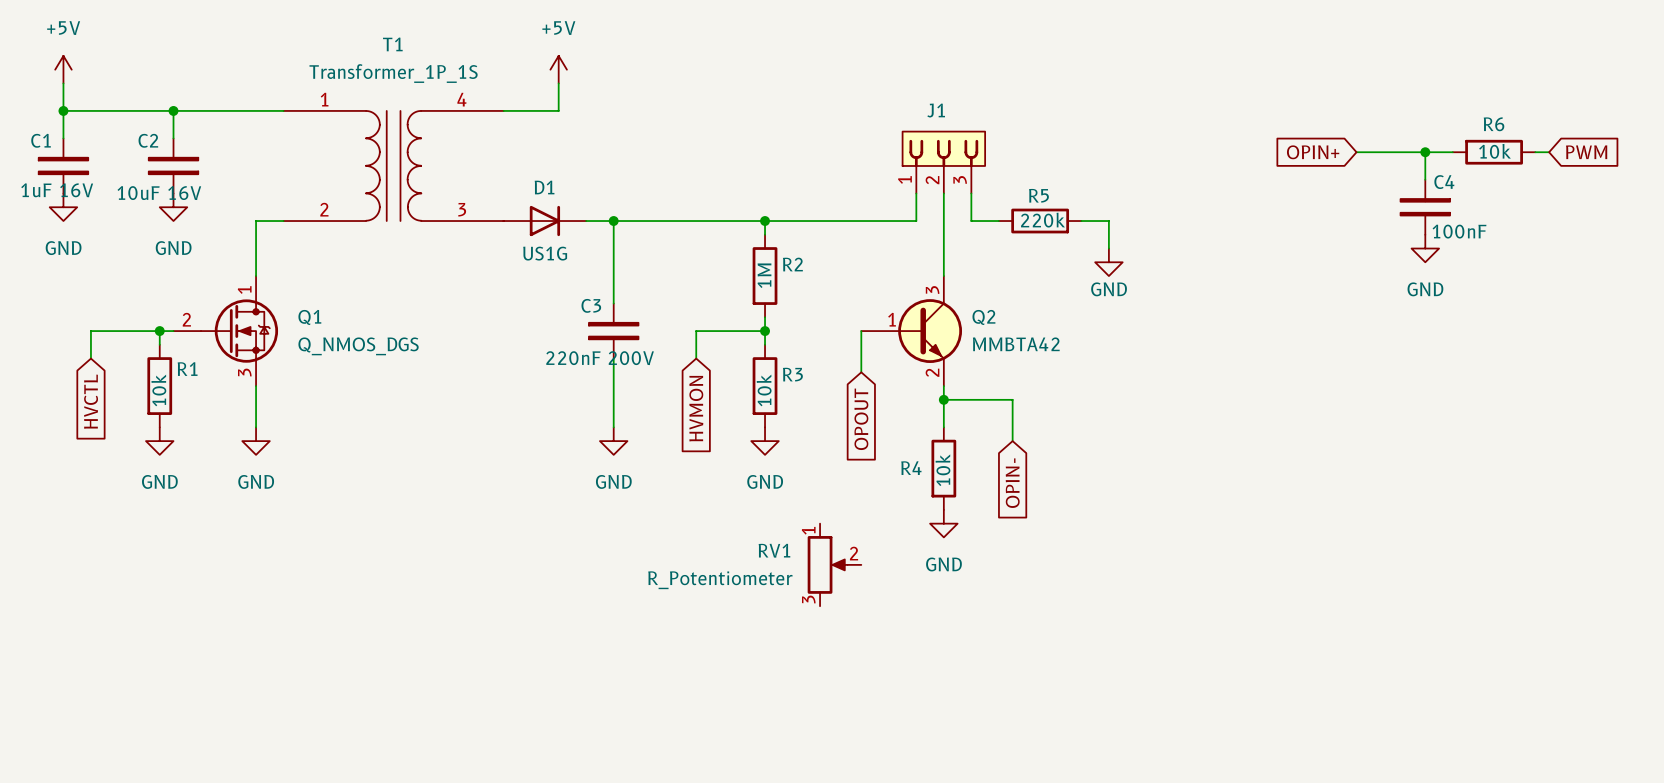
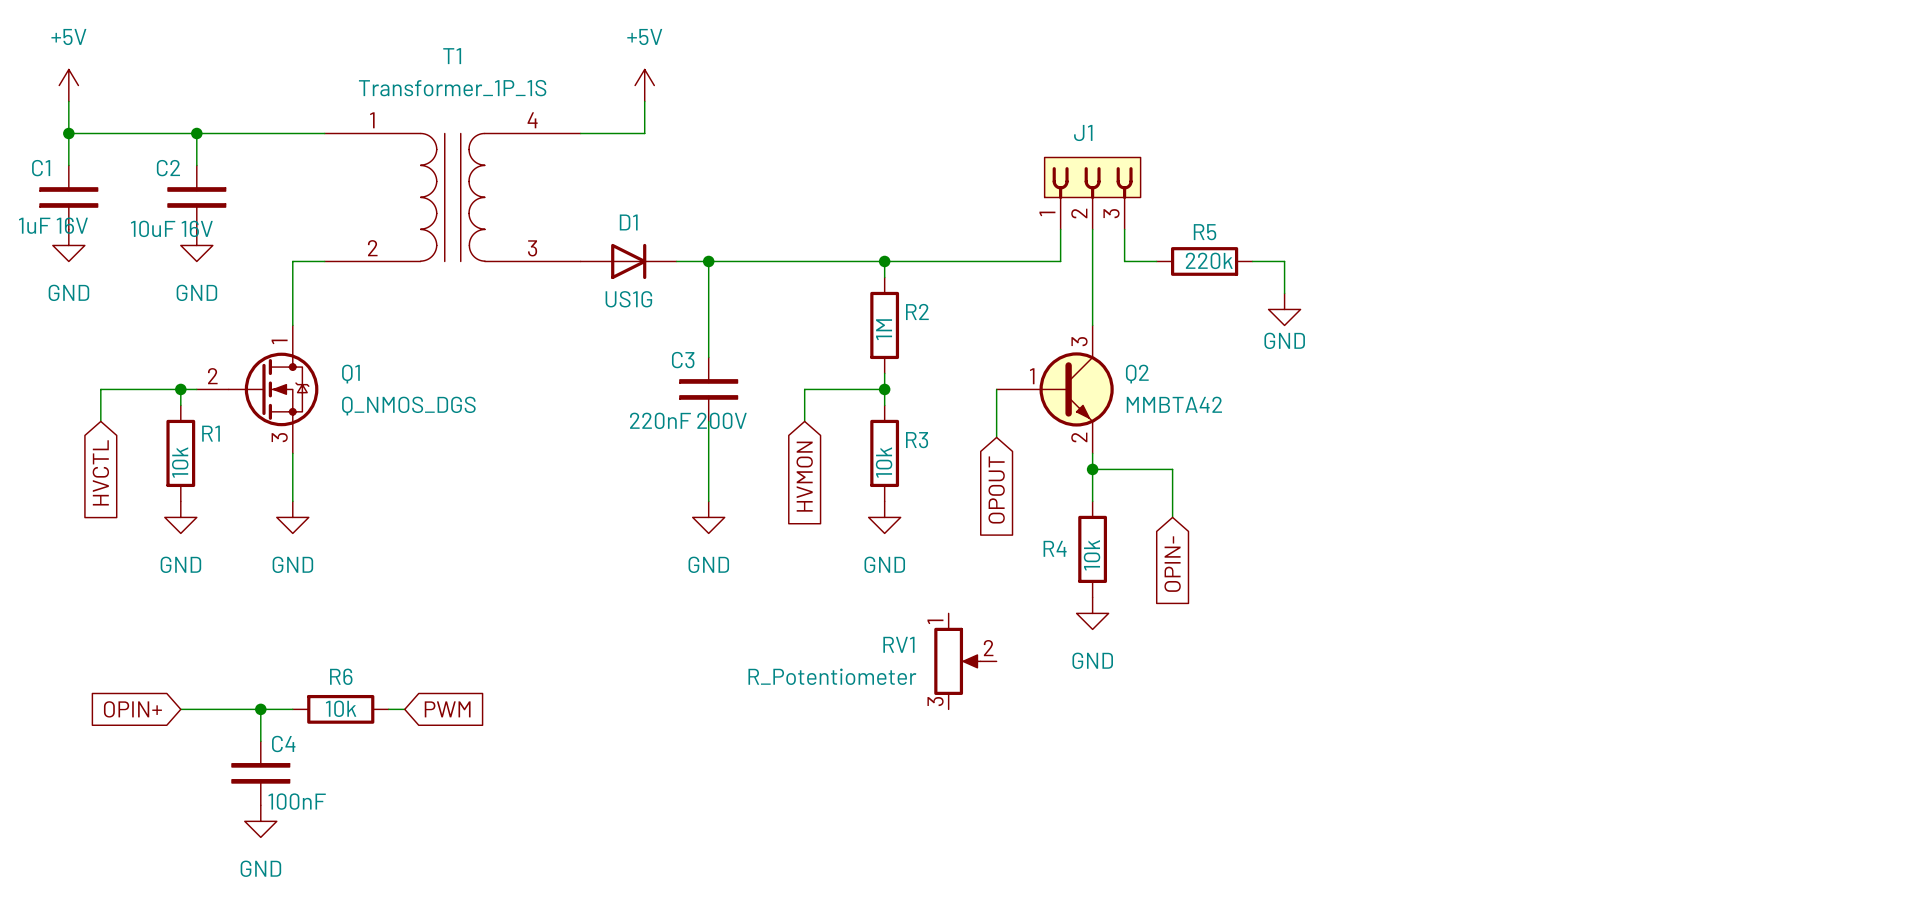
global label: OPIN+ (1313, 152) -> none
wire: (1356, 152) (1452, 152) -> none
wire: (1425, 152) (1425, 179) -> none
junction: (1425, 152) -> none
R6 position: (1494, 152) -> (340, 709)
wire: (1535, 152) (1549, 152) -> none
global label: PWM (1586, 152) -> none
C4 position: (1425, 207) -> (260, 773)
power symbol: GND (1425, 248) -> none
global label: none -> OPIN+ (132, 709)
wire: none -> (180, 709) (292, 709)
wire: none -> (260, 709) (260, 741)
junction: none -> (260, 709)
wire: none -> (388, 709) (404, 709)
global label: none -> PWM (447, 709)
power symbol: none -> GND (260, 821)

